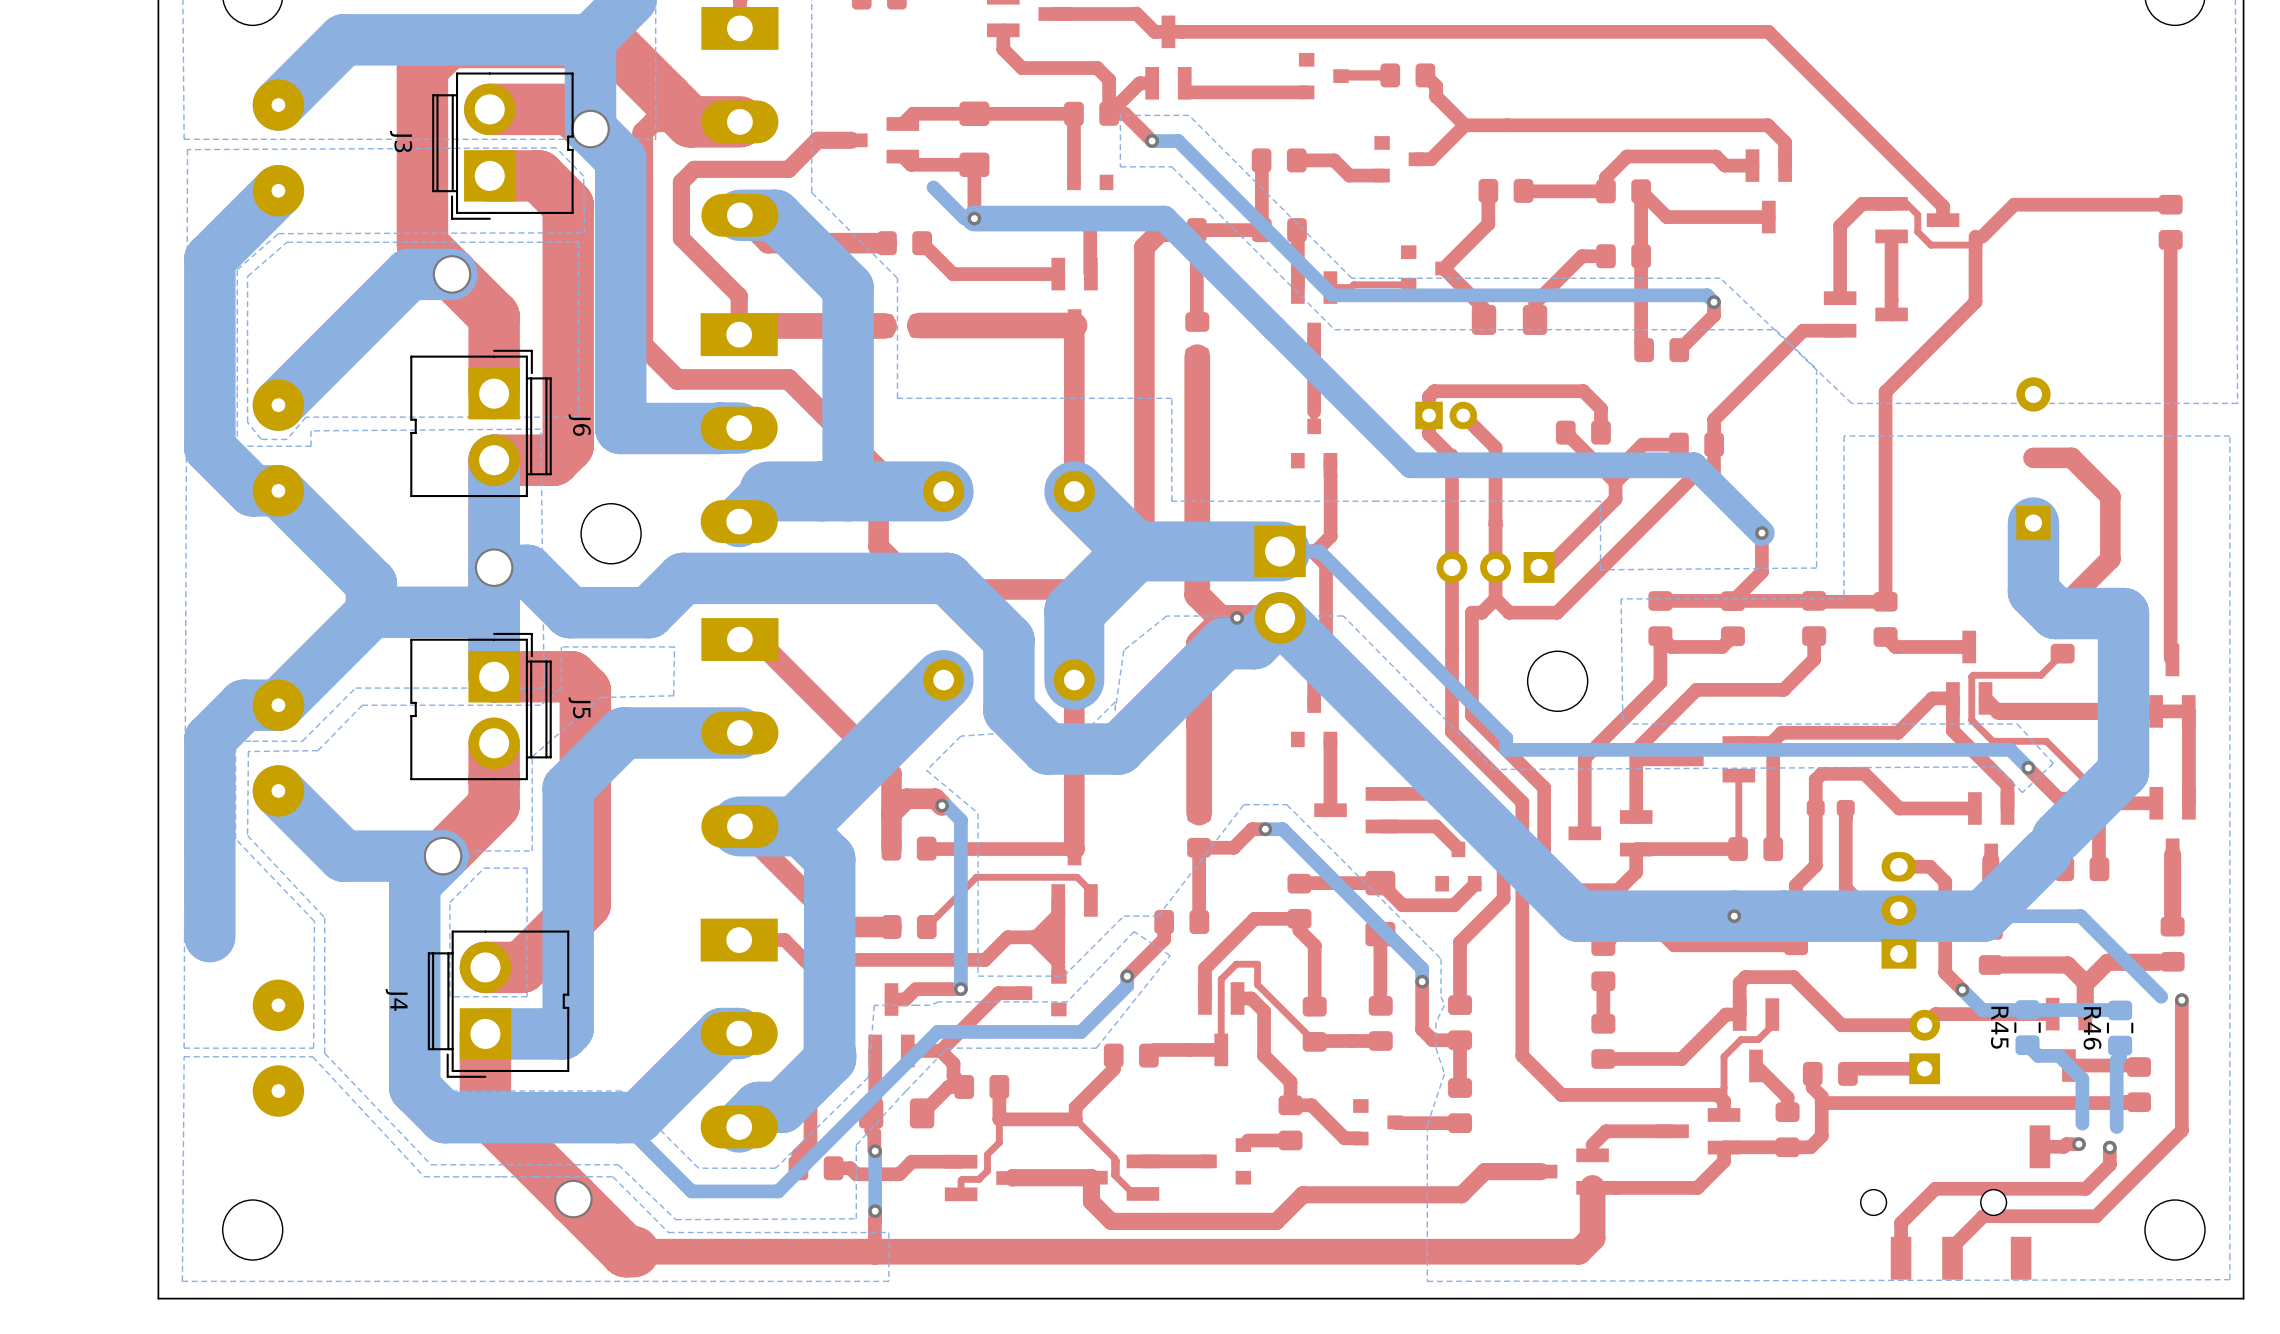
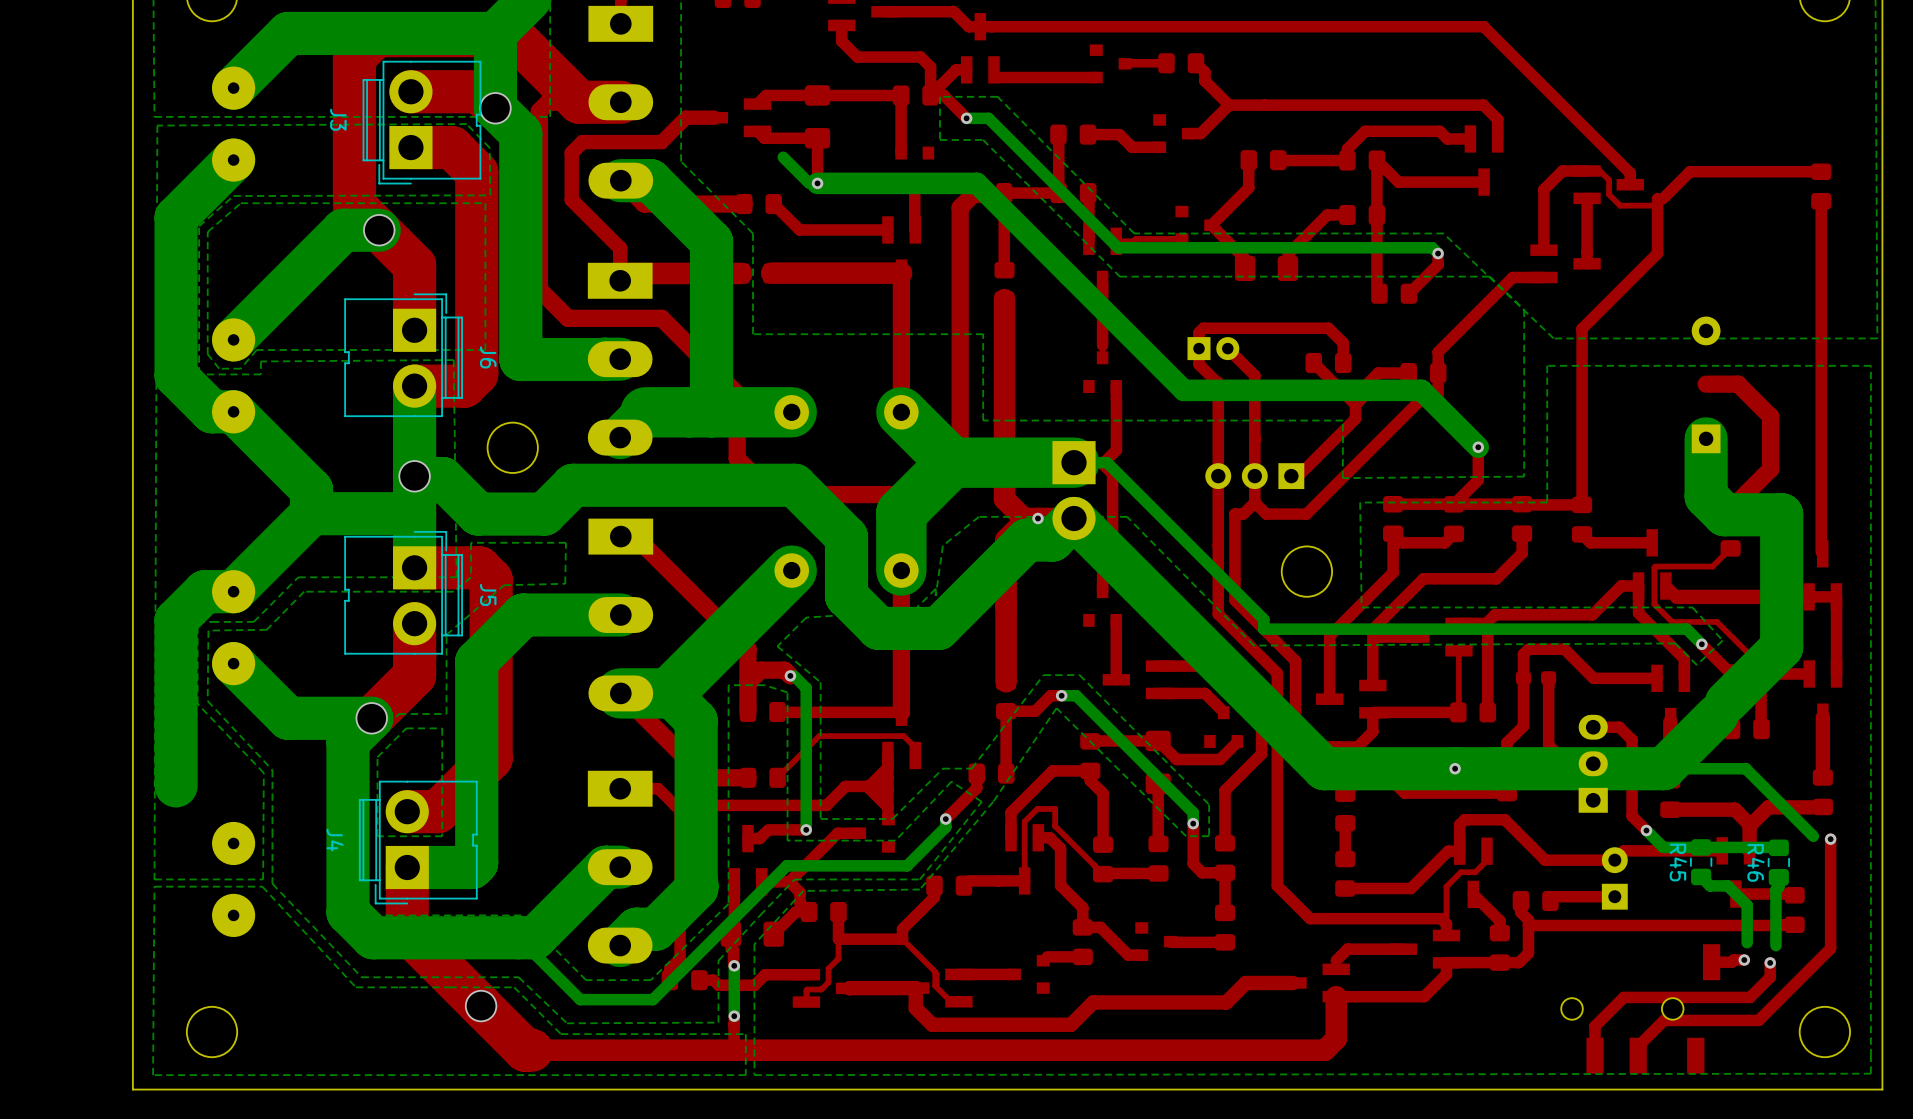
bottom zone outline: (1441, 996) (1444, 1005) (1435, 1022) (1435, 1048) (1444, 1073) (1427, 1125) (1427, 1281) (2229, 1279) -> (1209, 836) (1186, 836) (1056, 708) (993, 801) (919, 889) (803, 890) (754, 944) (754, 1075) (1870, 1073)
bottom zone outline: (938, 1001) (930, 1005) (874, 1005) (868, 1077) -> (787, 840) (787, 692) (764, 685) (728, 685) (728, 903)

